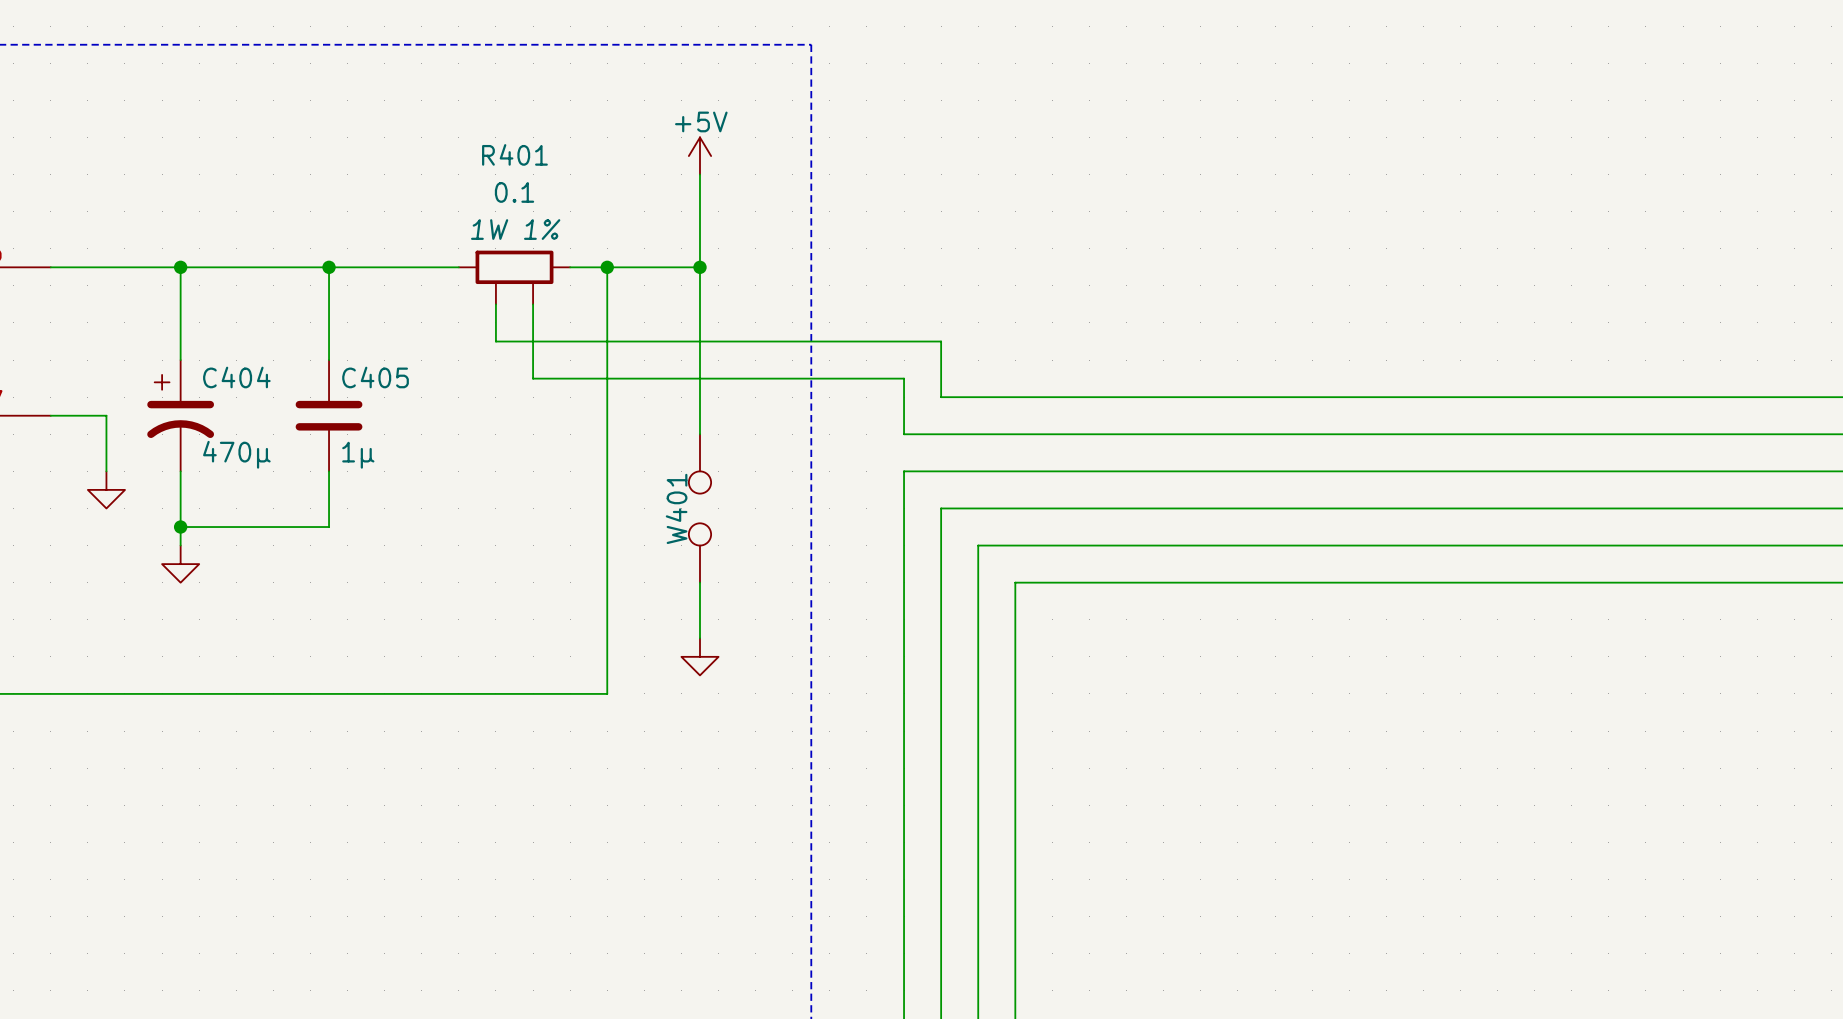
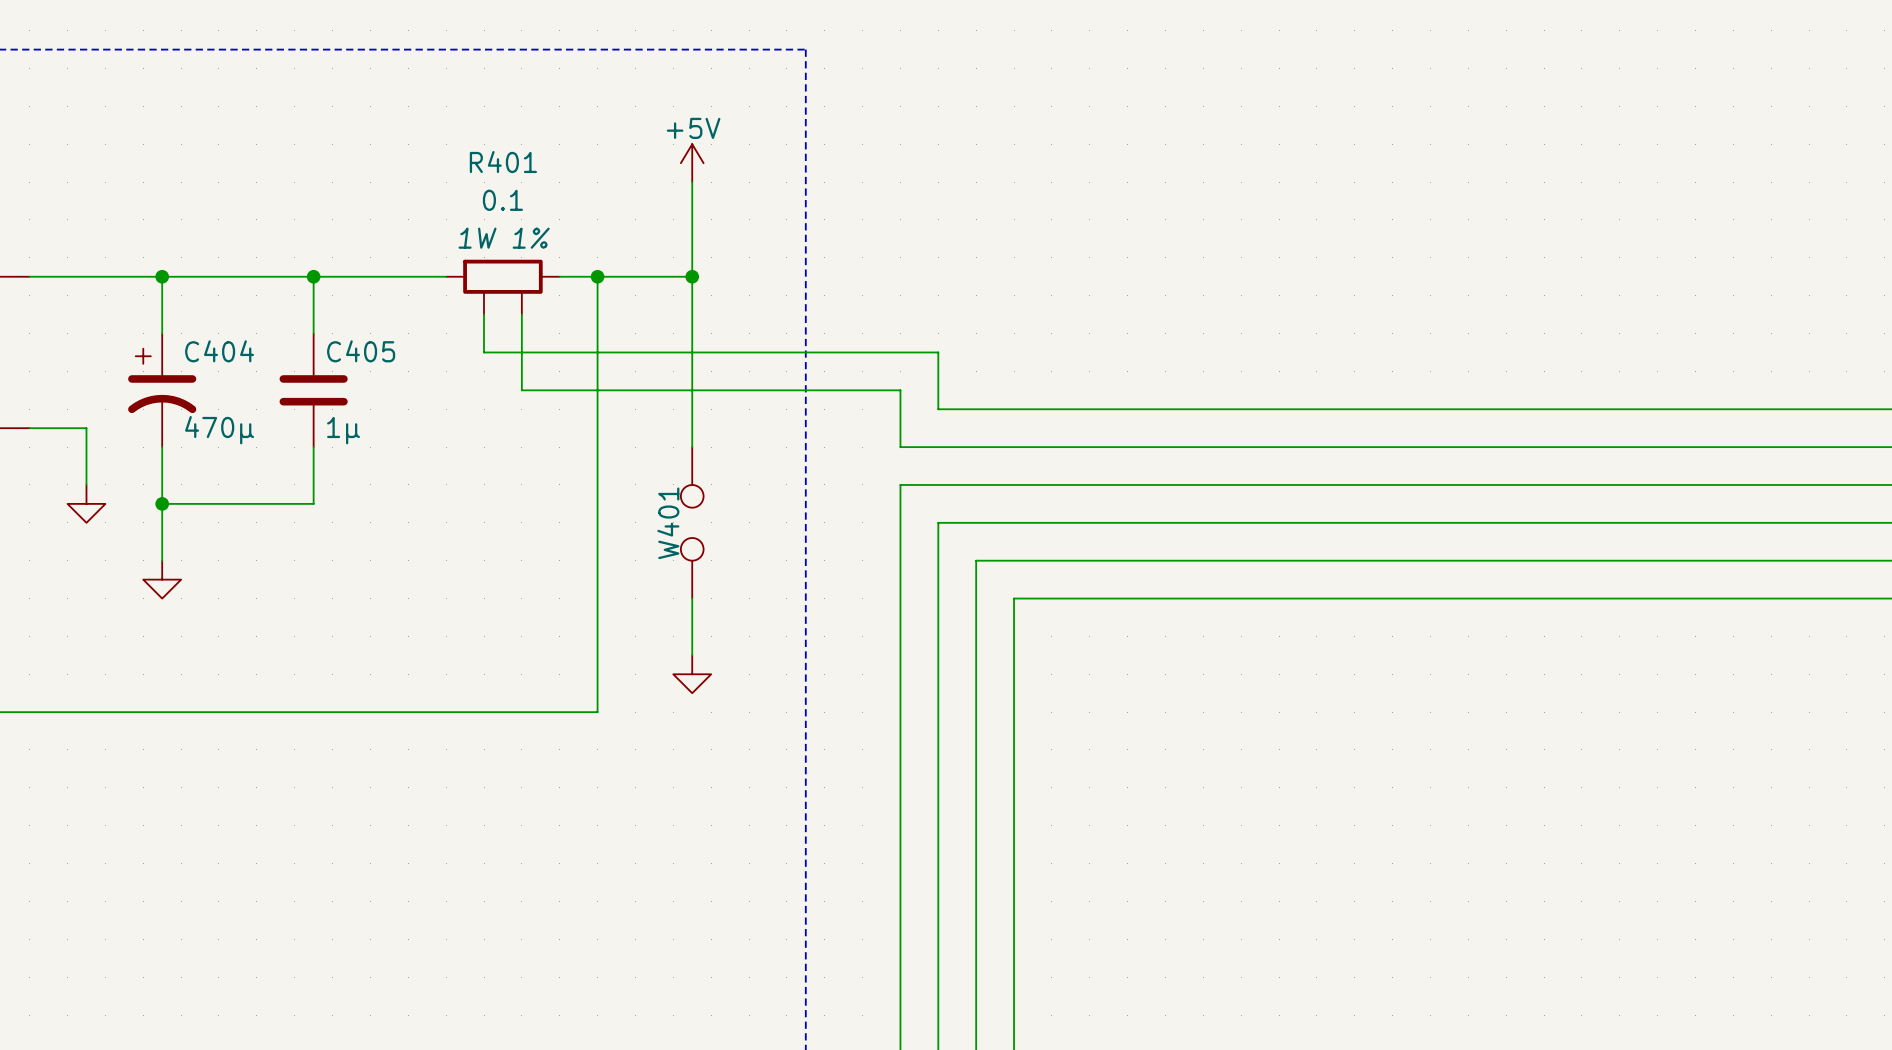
C404 position: (180, 415) -> (162, 390)
C405 position: (329, 415) -> (313, 390)
wire: (329, 489) (329, 527) (180, 527) -> (313, 503) (162, 503)
junction position: (180, 527) -> (162, 503)

